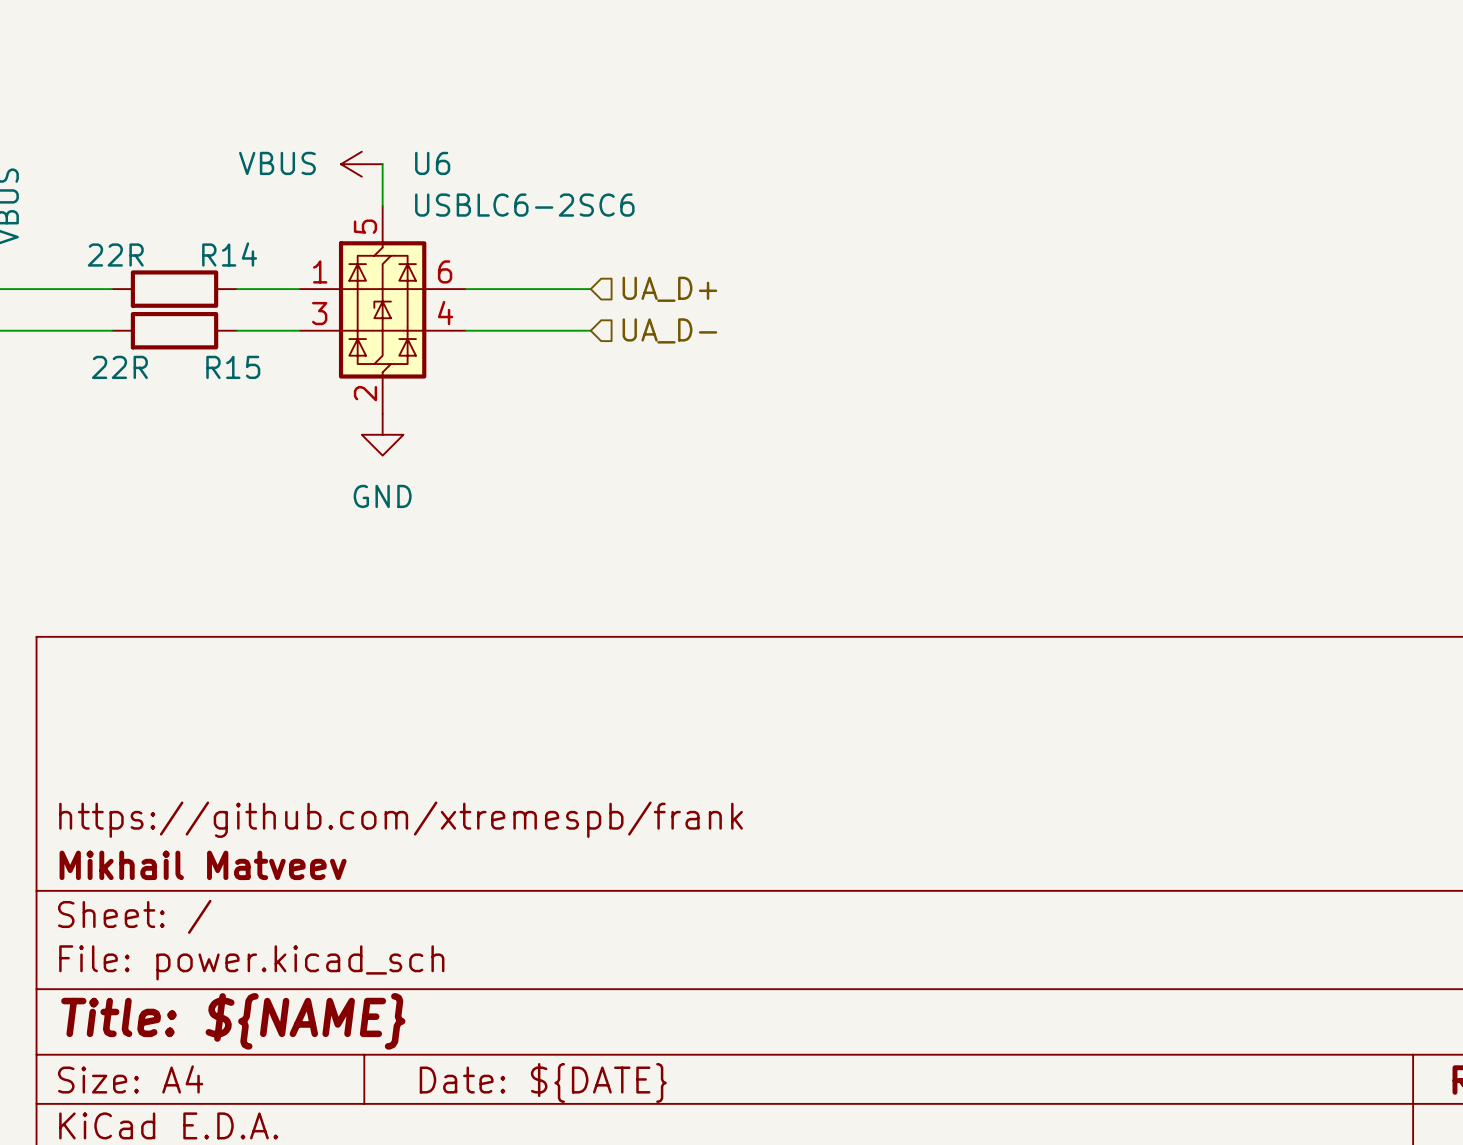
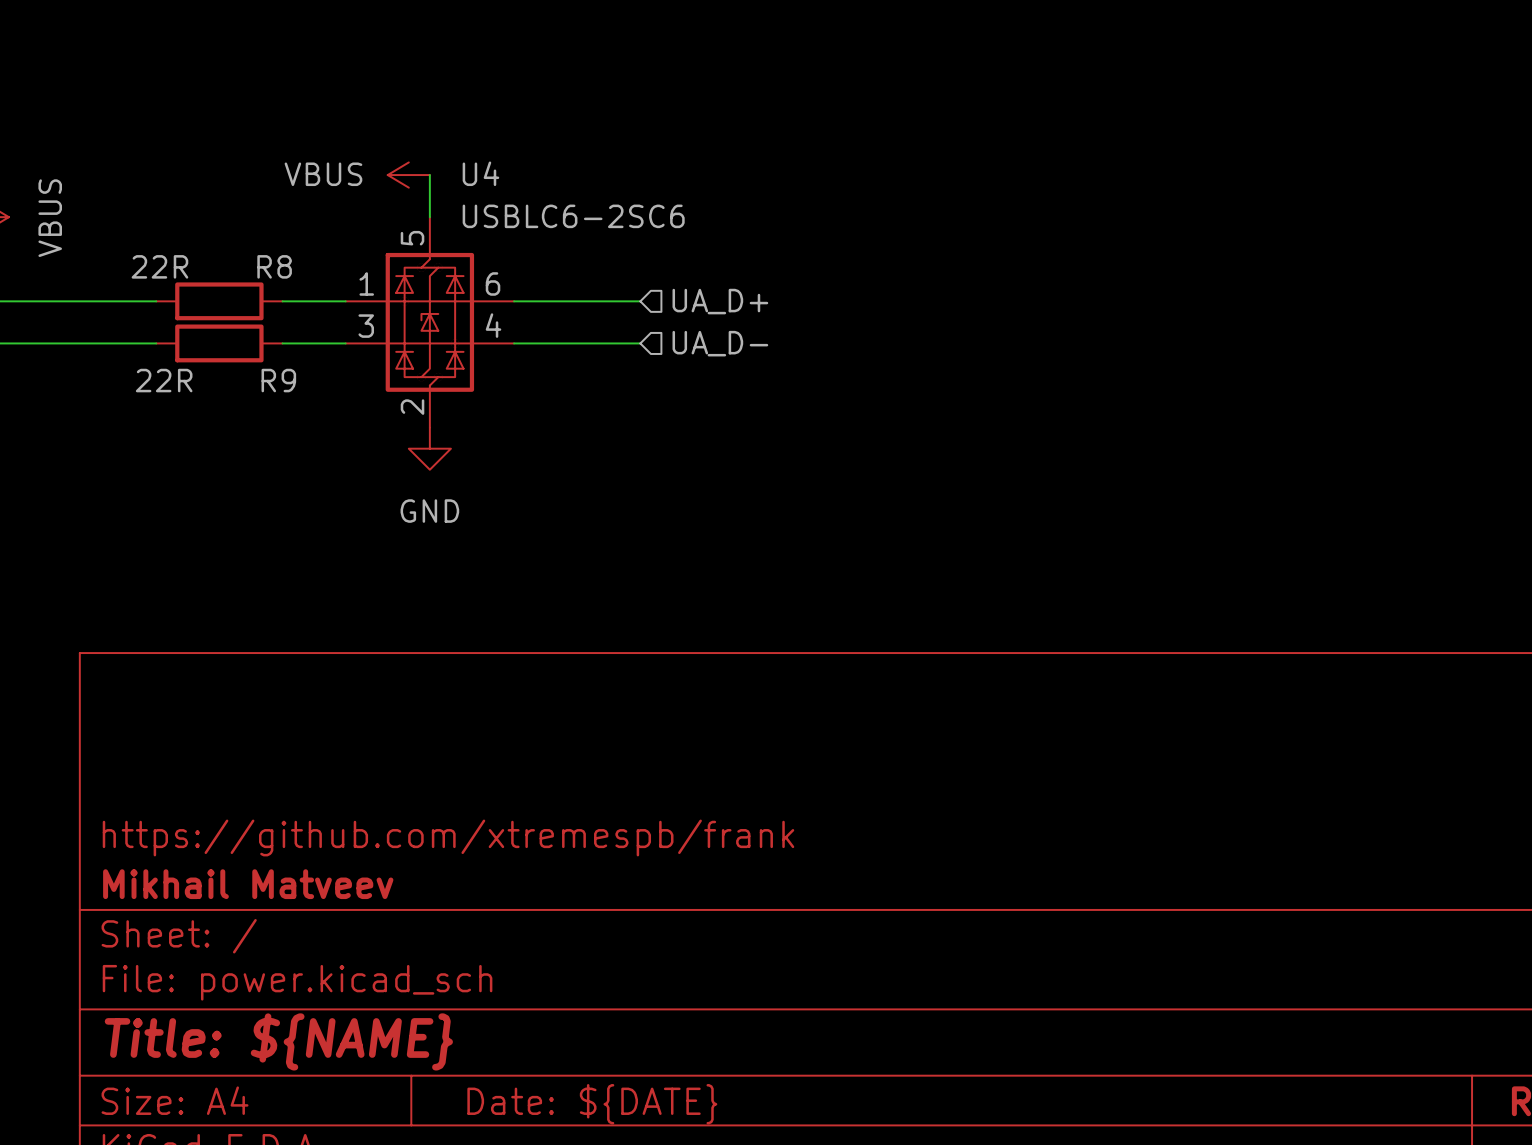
U6 name: U6 (432, 163) -> U4 (480, 173)
R14 name: R14 (229, 254) -> R8 (274, 266)
R15 name: R15 (233, 367) -> R9 (278, 380)

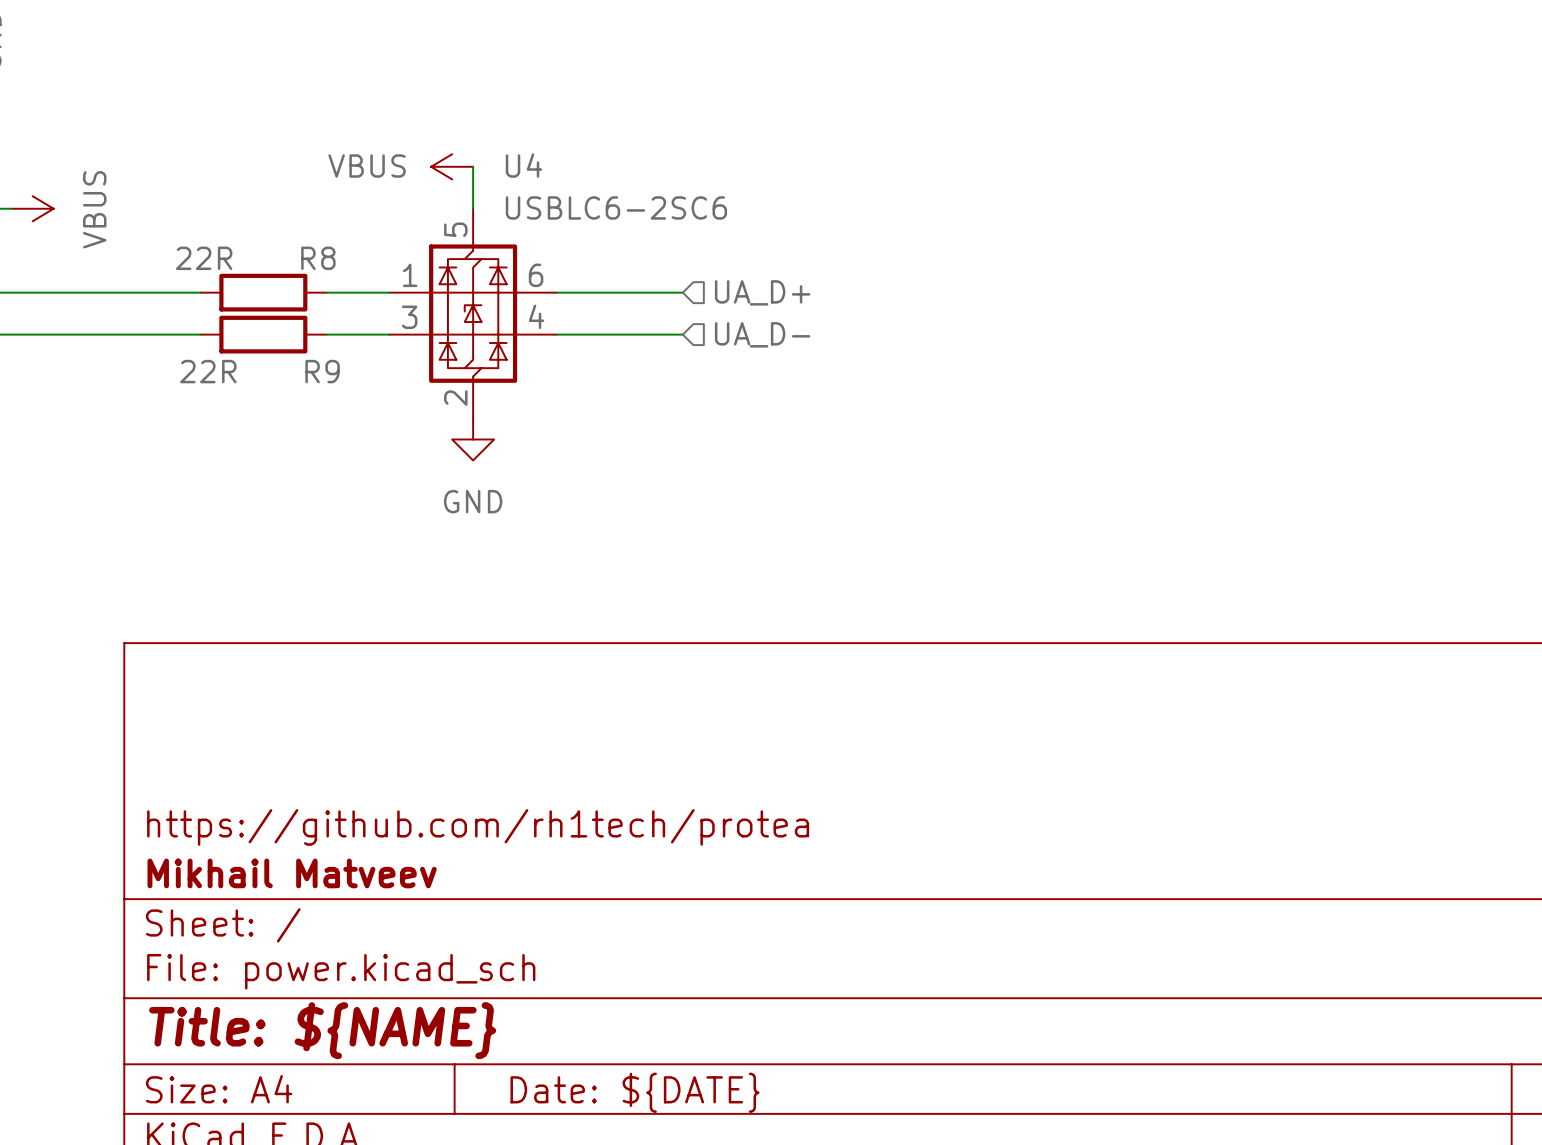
title block: https://github.com/xtremespb/frank (448, 837) -> https://github.com/rh1tech/protea (478, 827)

